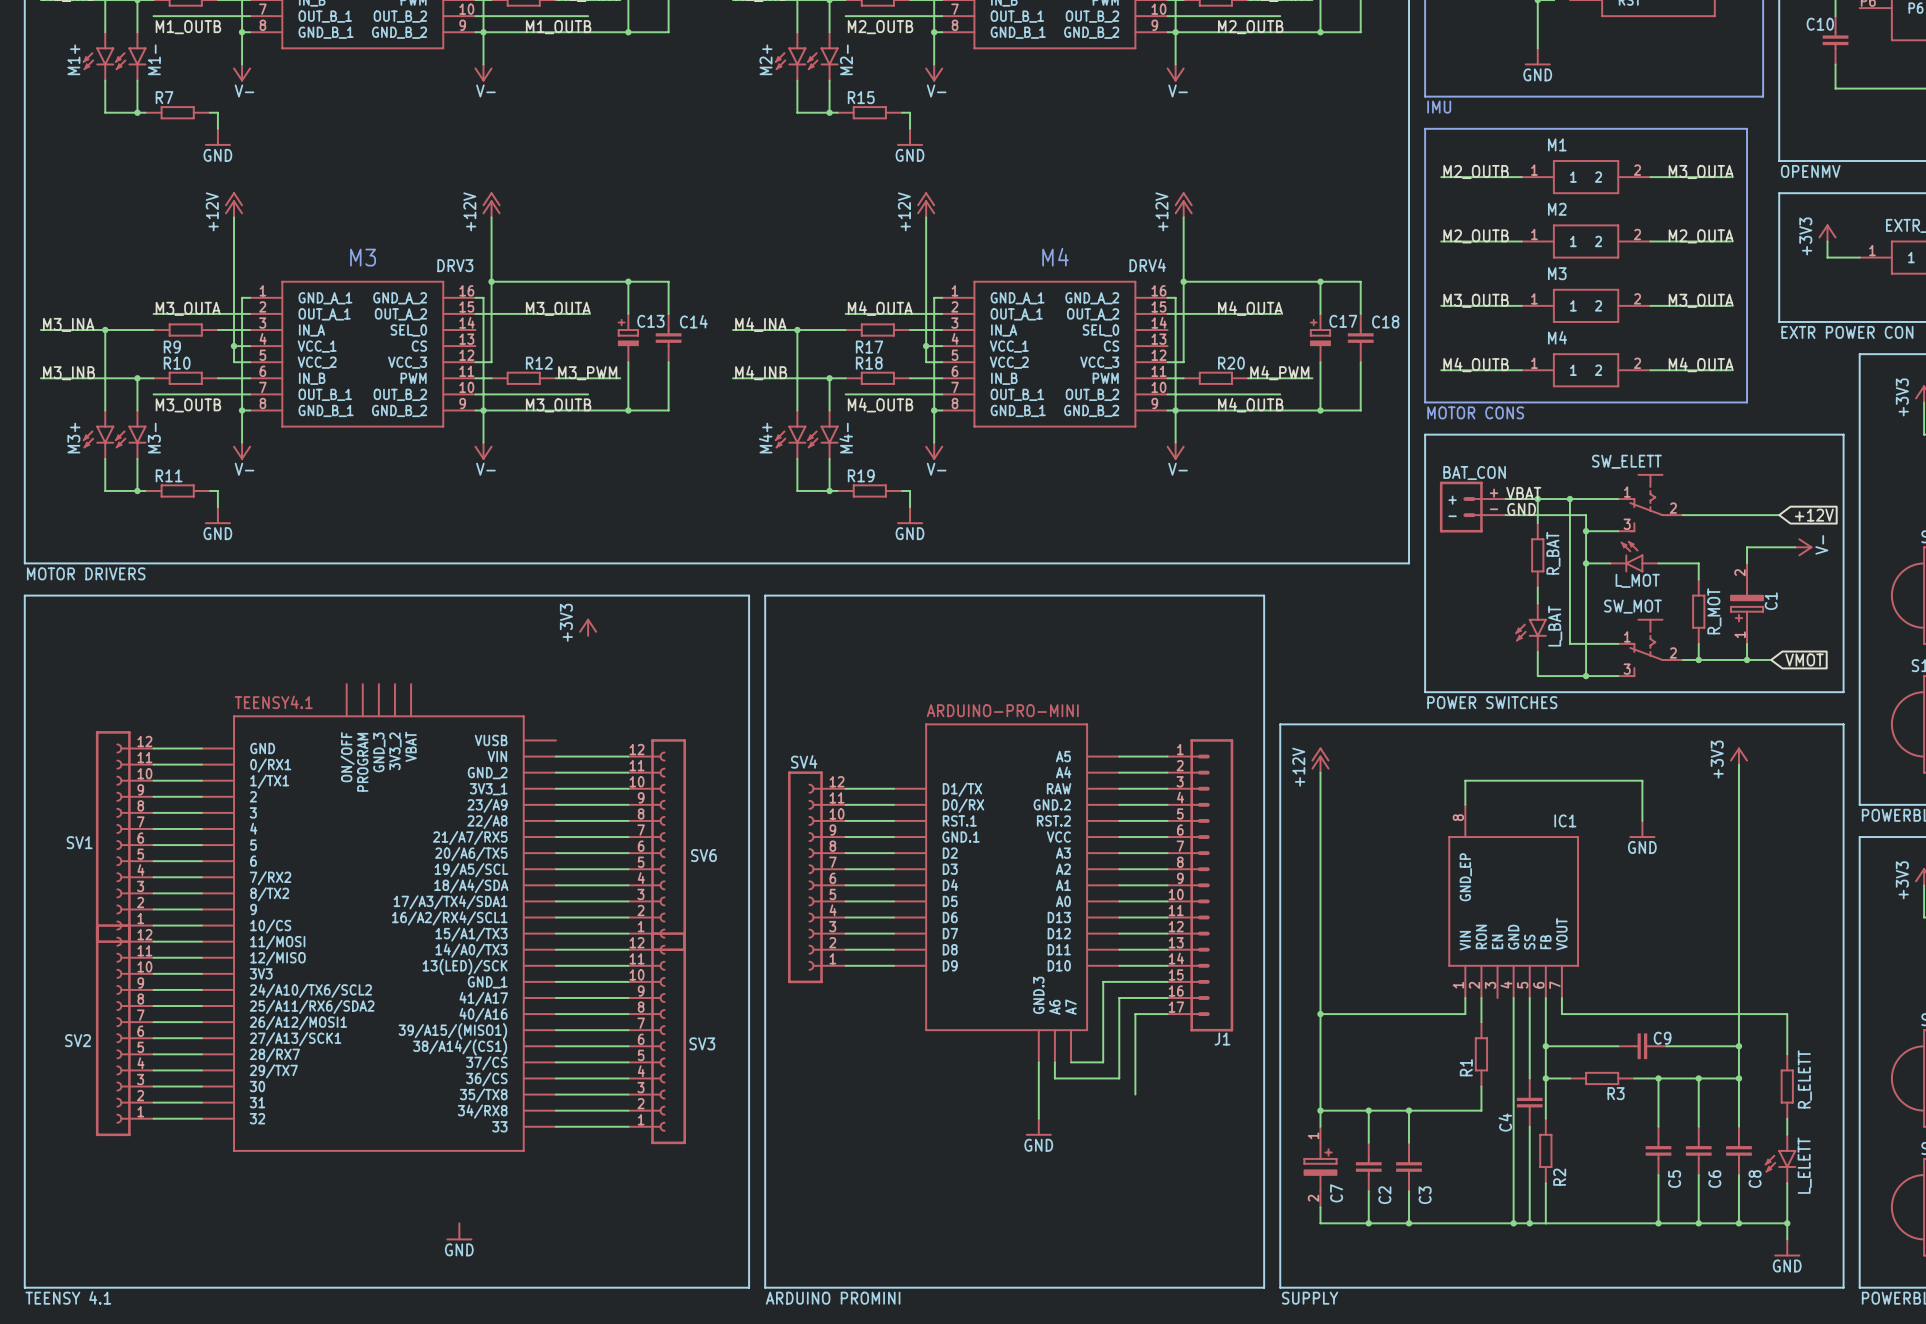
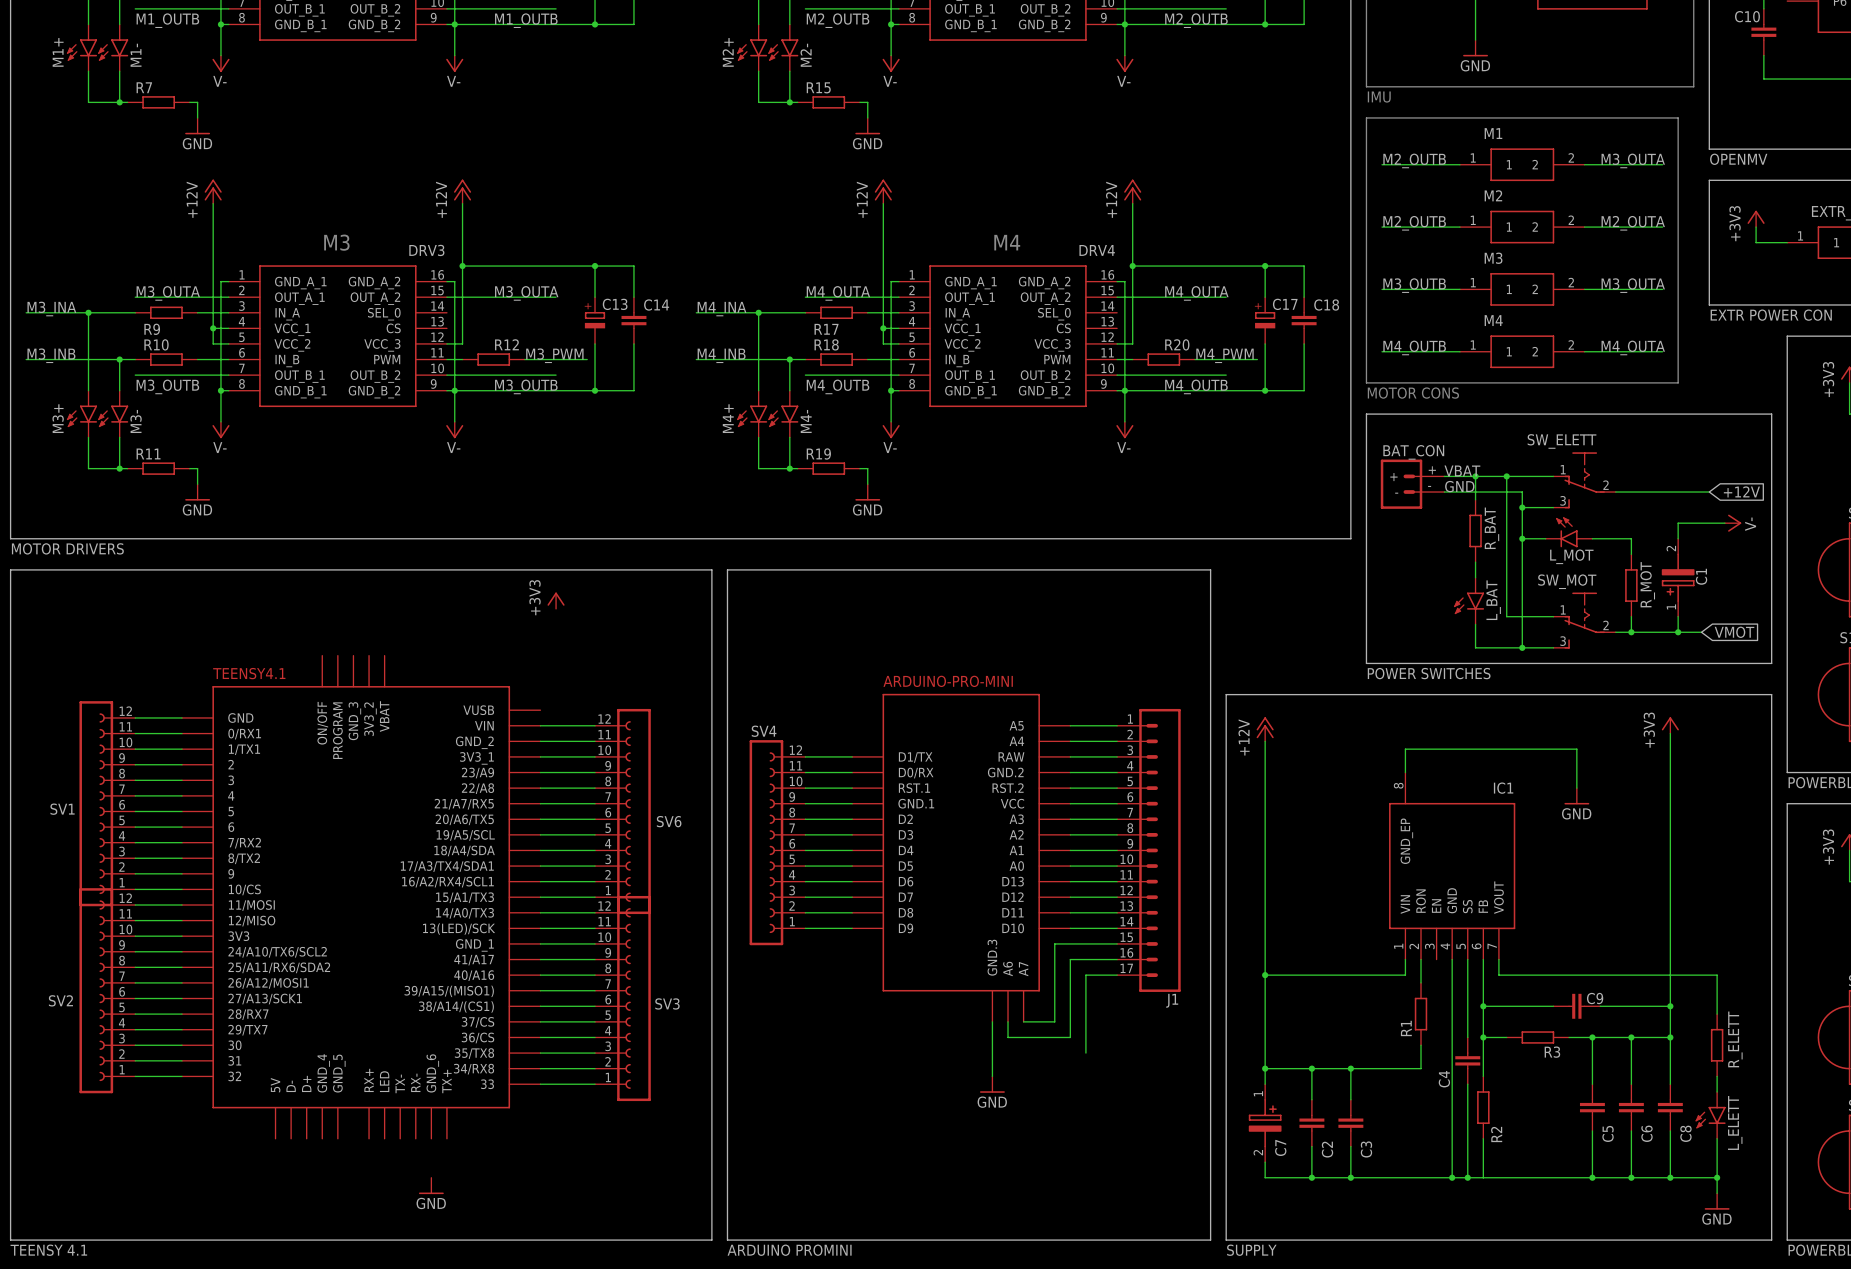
part: (378, 917) -> none
part: none -> (361, 897)

